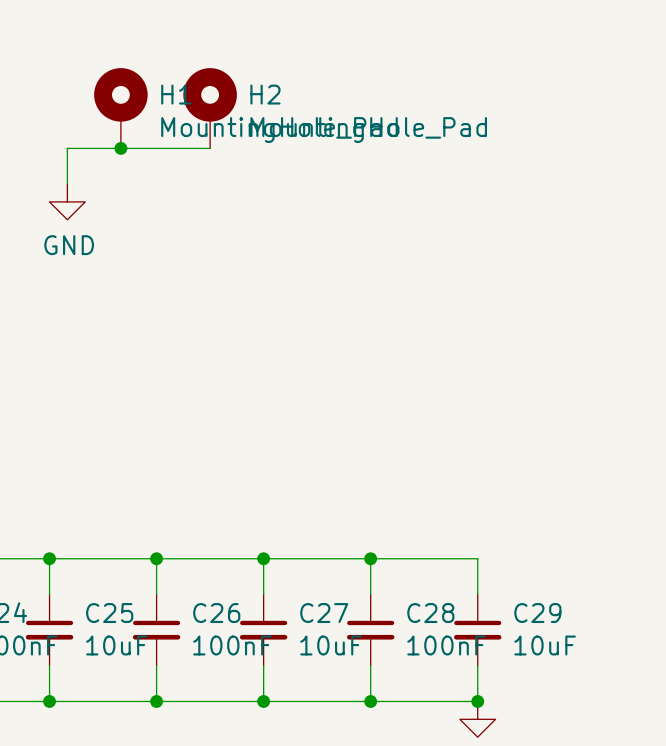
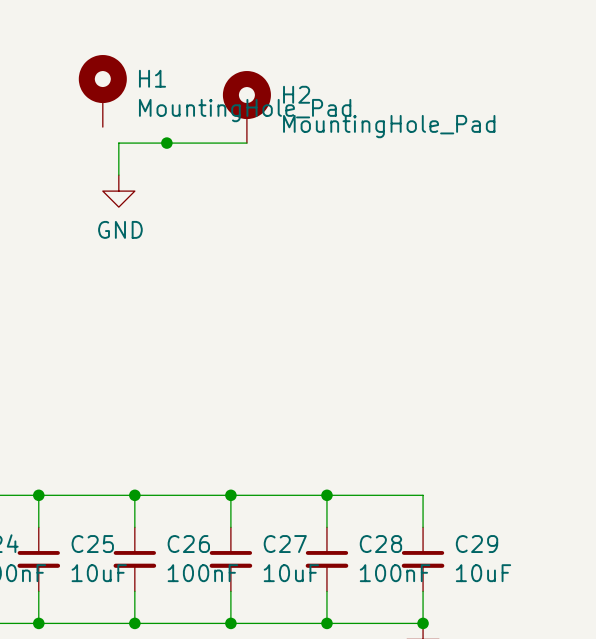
H2 position: (210, 108) -> (246, 107)
junction position: (120, 148) -> (166, 143)
wire: (210, 148) (67, 148) (67, 184) -> (246, 143) (118, 143) (118, 175)
power symbol position: GND (67, 201) -> GND (118, 191)

